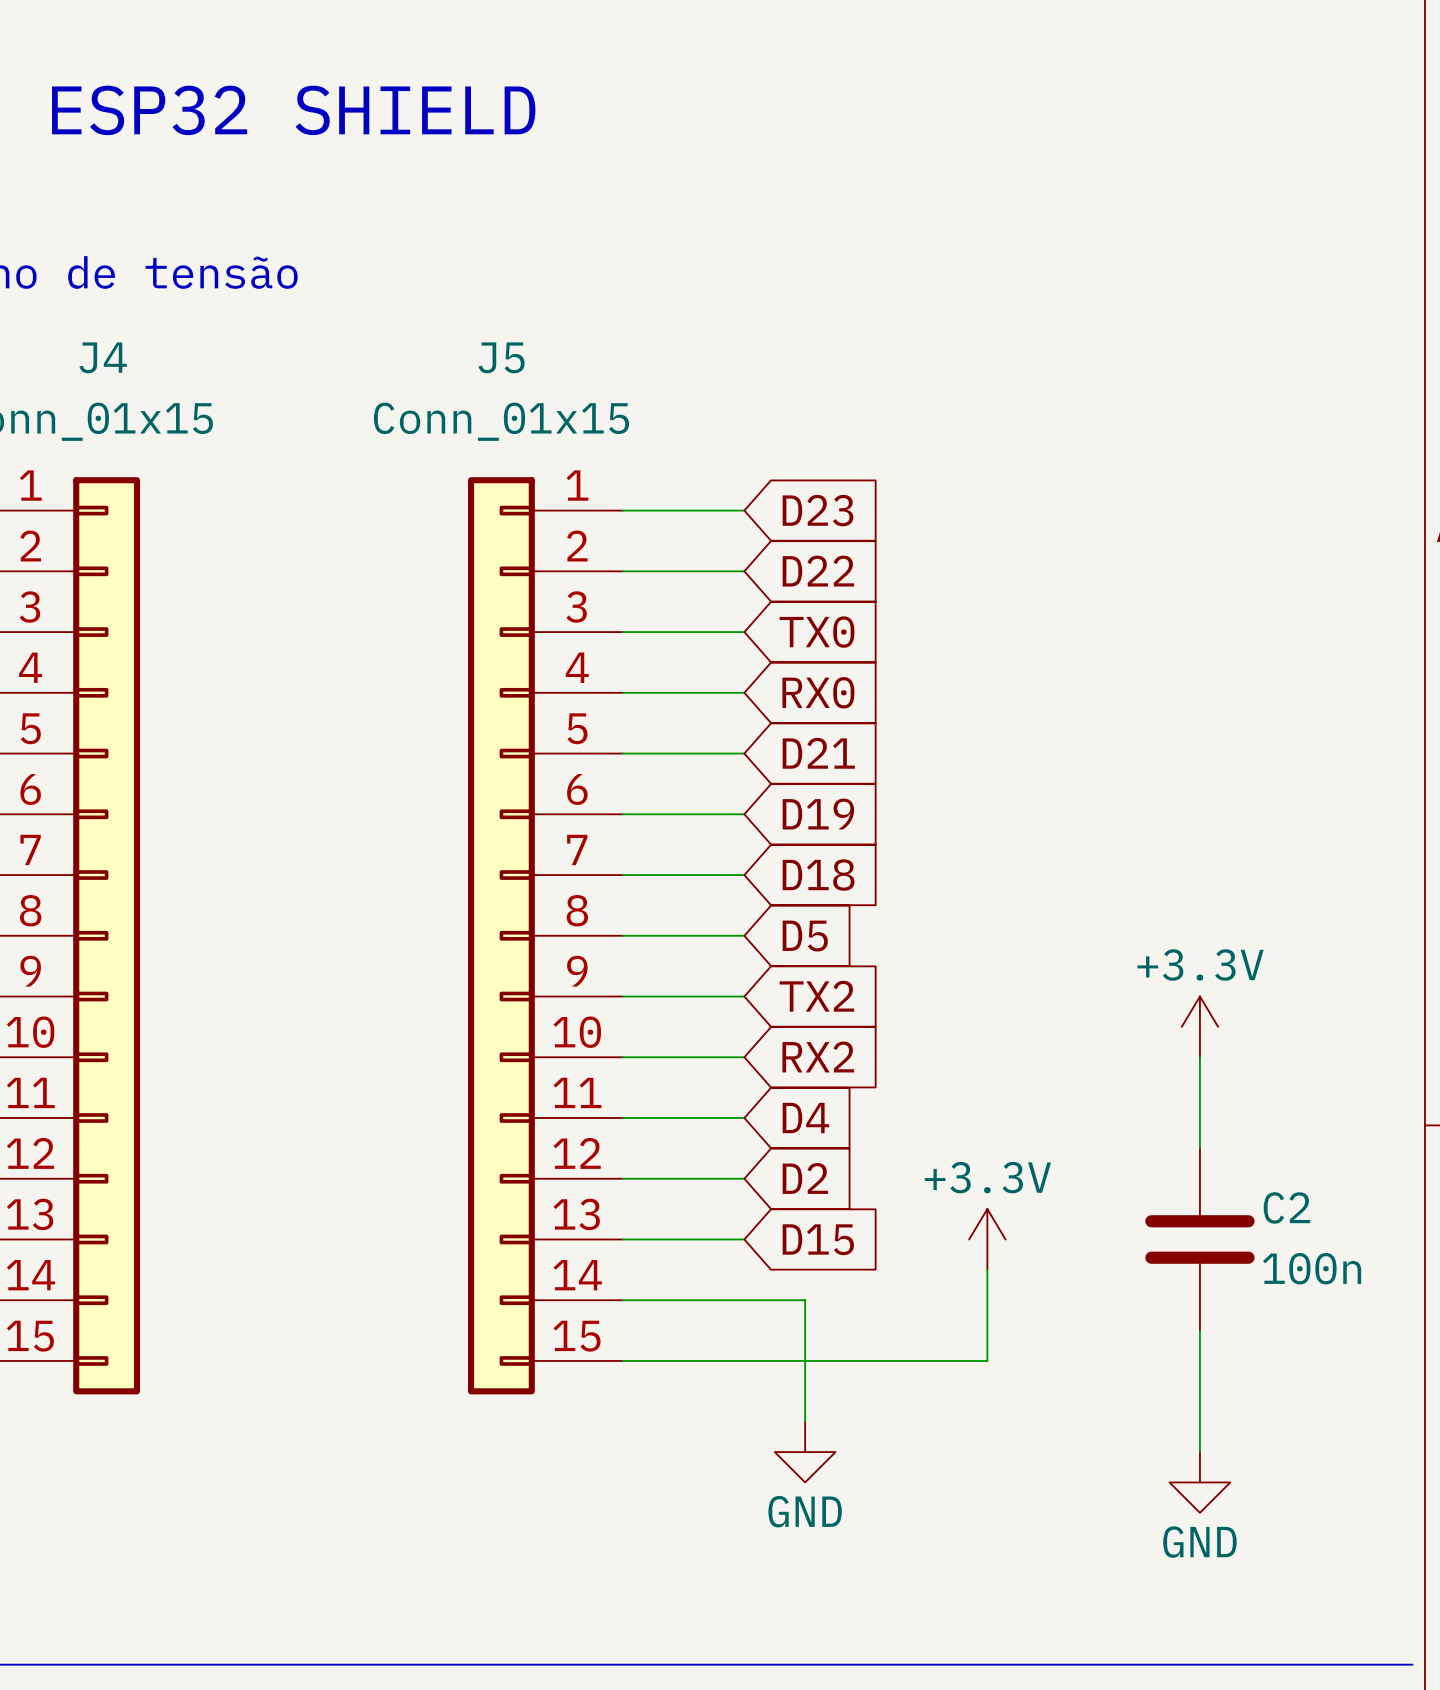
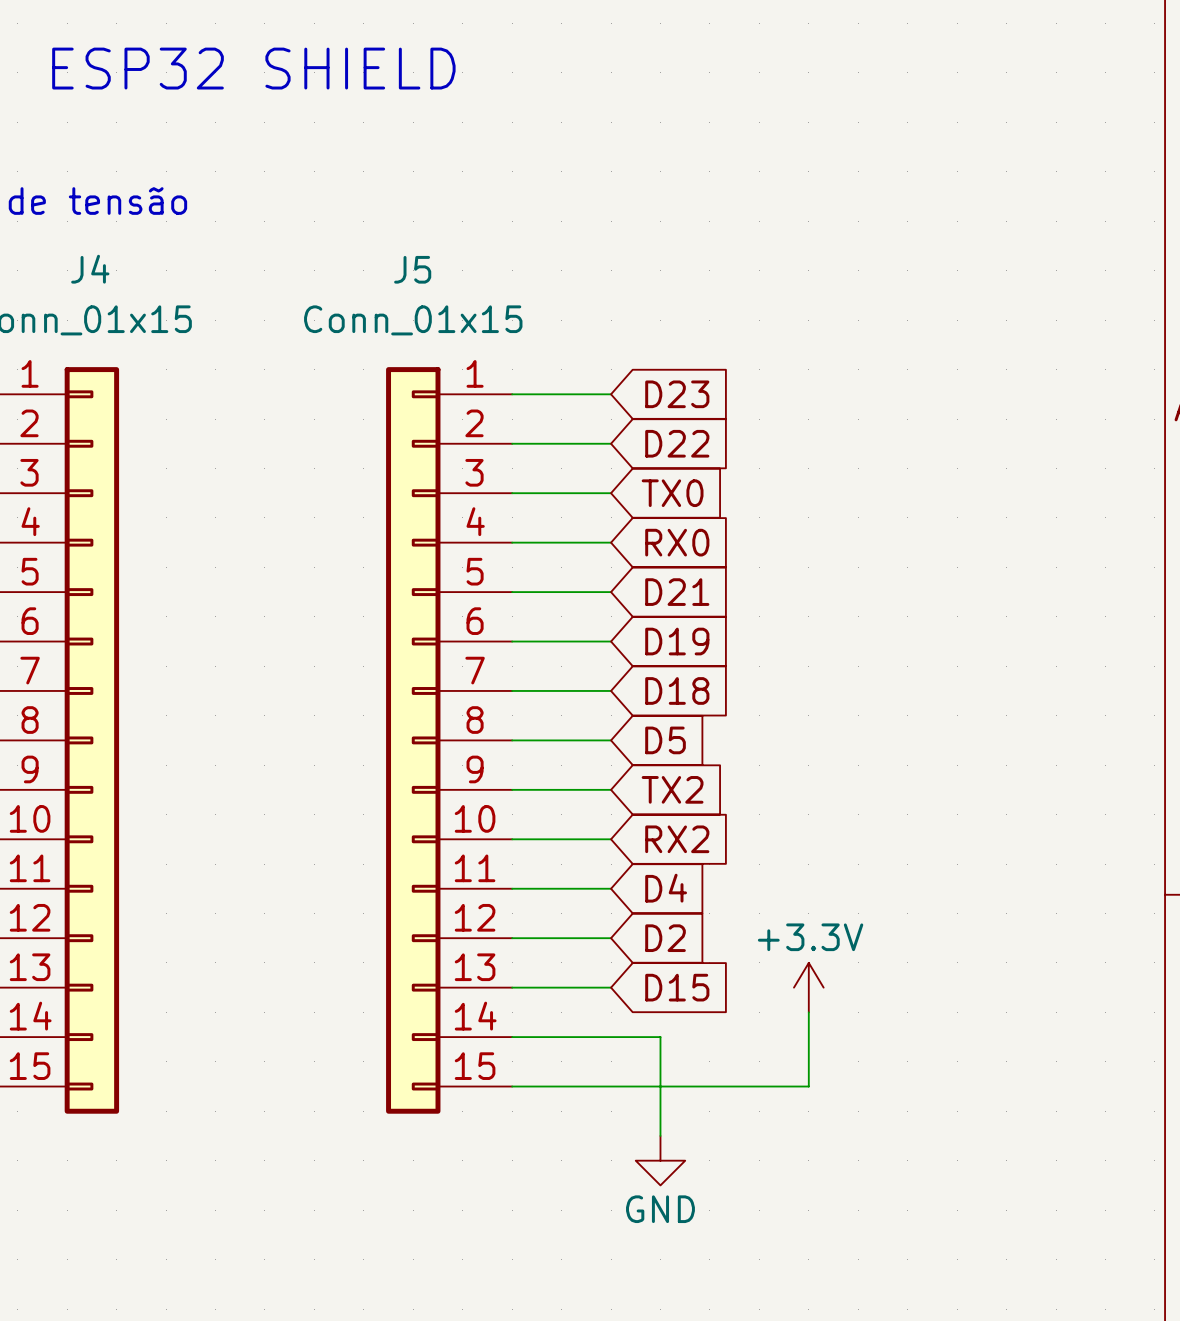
power symbol: +3.3V (1199, 1026) -> none
wire: (1199, 1057) (1199, 1148) -> none
C2: 100n (1199, 1239) -> none
wire: (1199, 1330) (1199, 1452) -> none
power symbol: GND (1199, 1482) -> none

